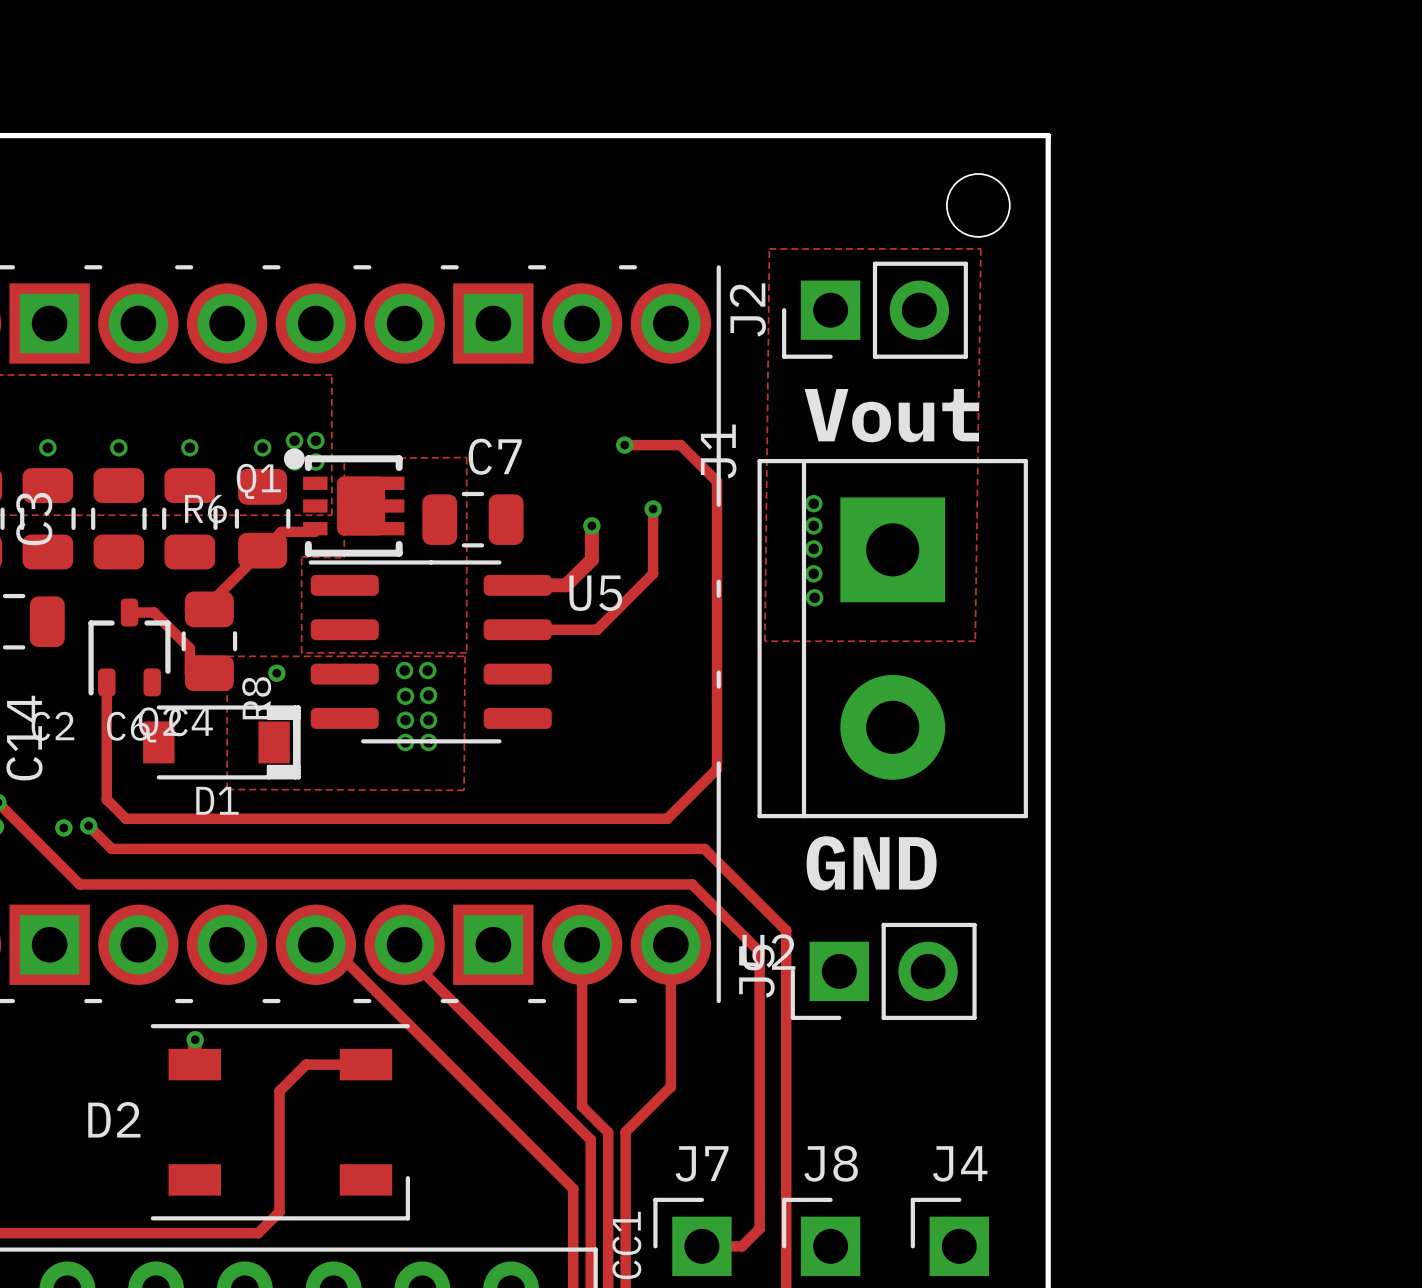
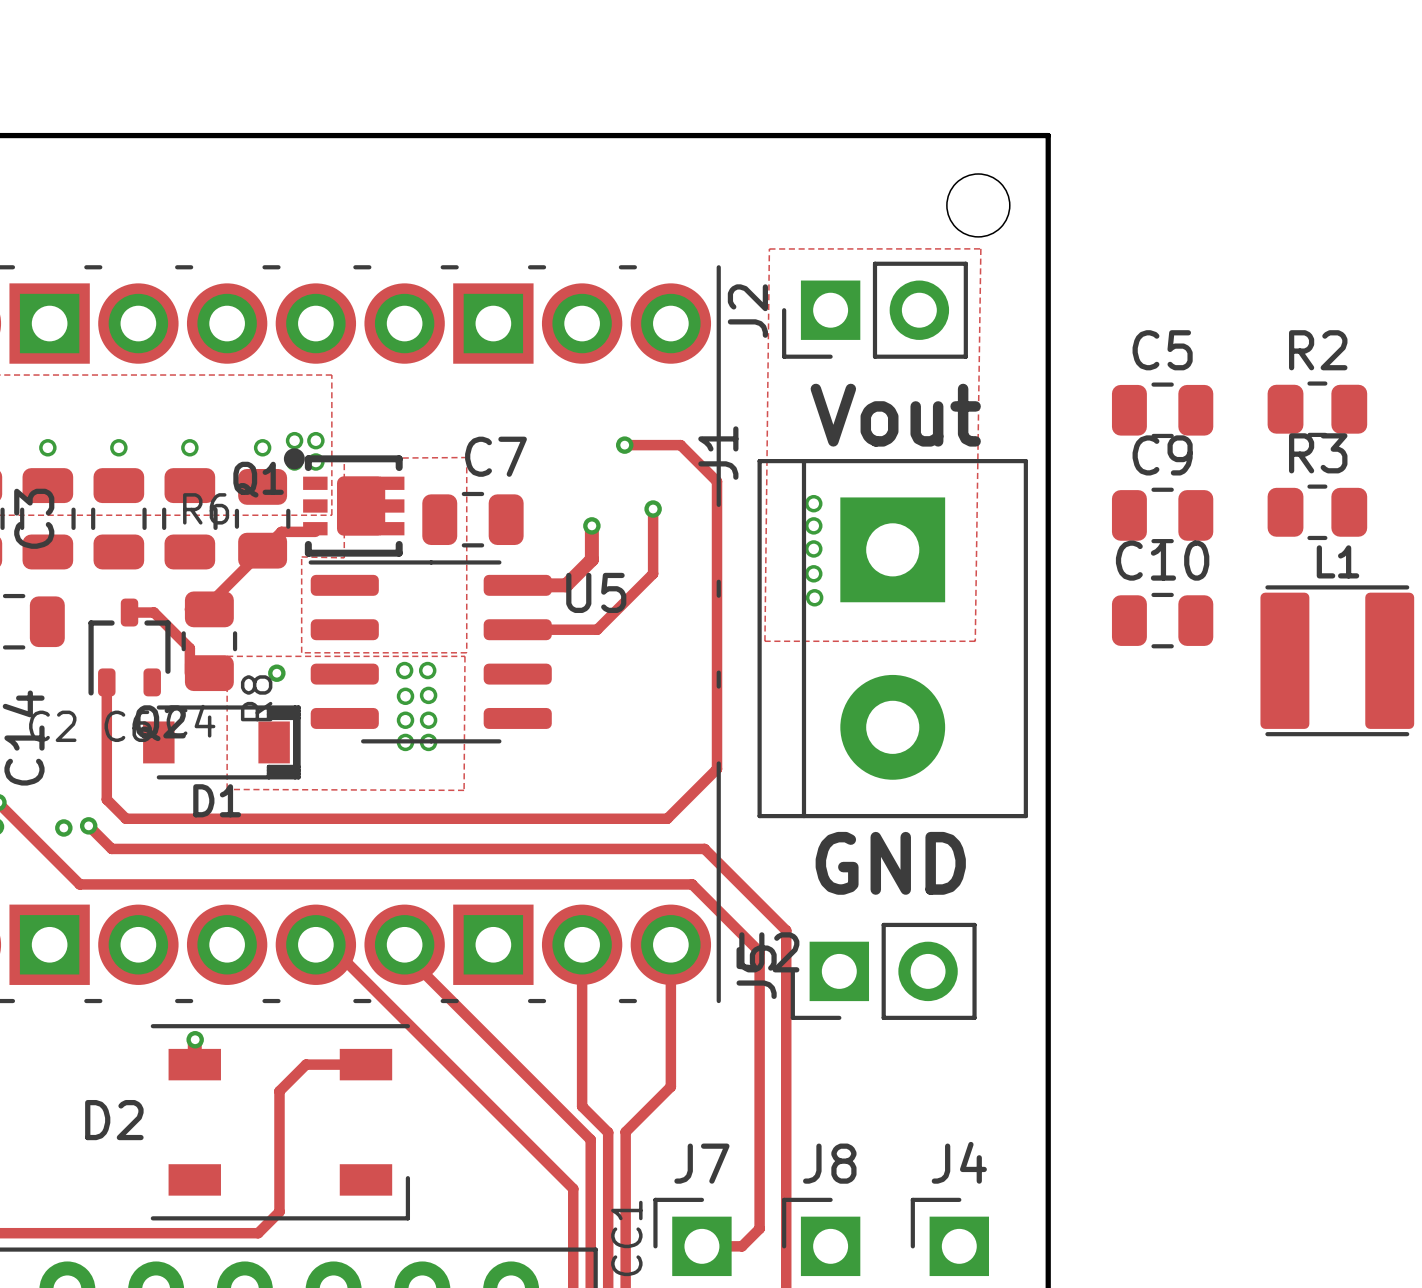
R2: none -> (1317, 409)
C5: none -> (1162, 410)
R3: none -> (1317, 512)
C9: none -> (1162, 515)
C10: none -> (1162, 620)
L1: none -> (1337, 660)

